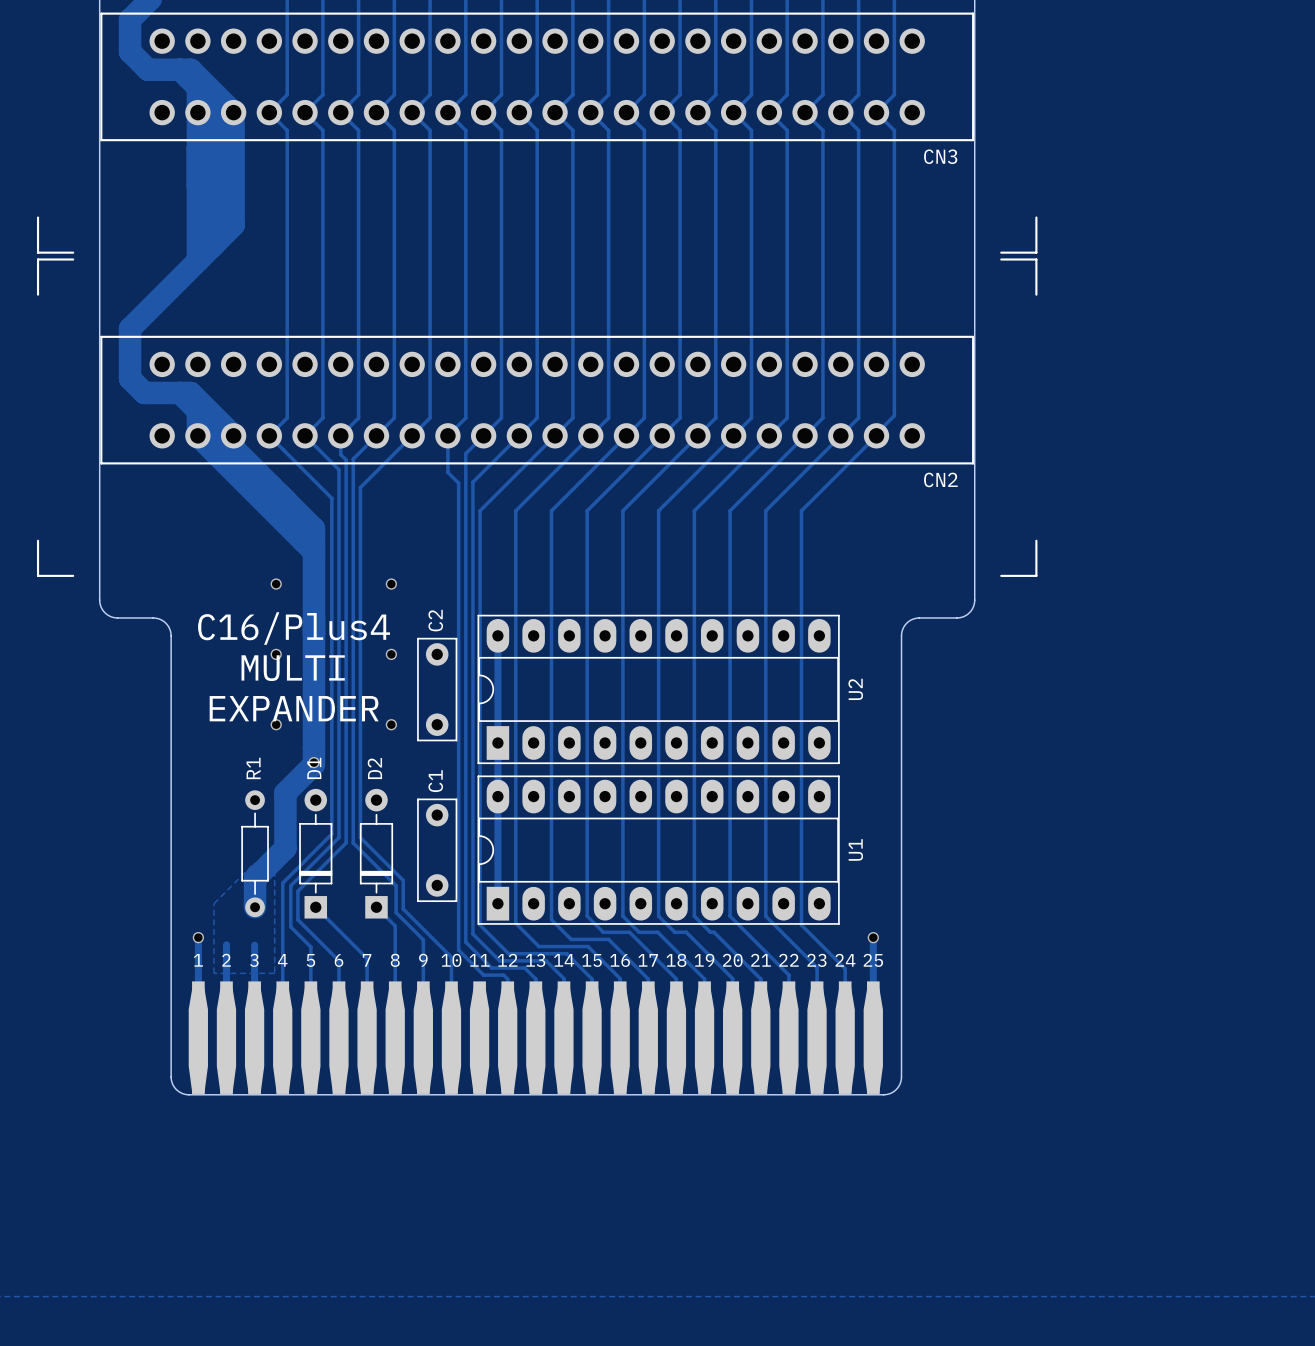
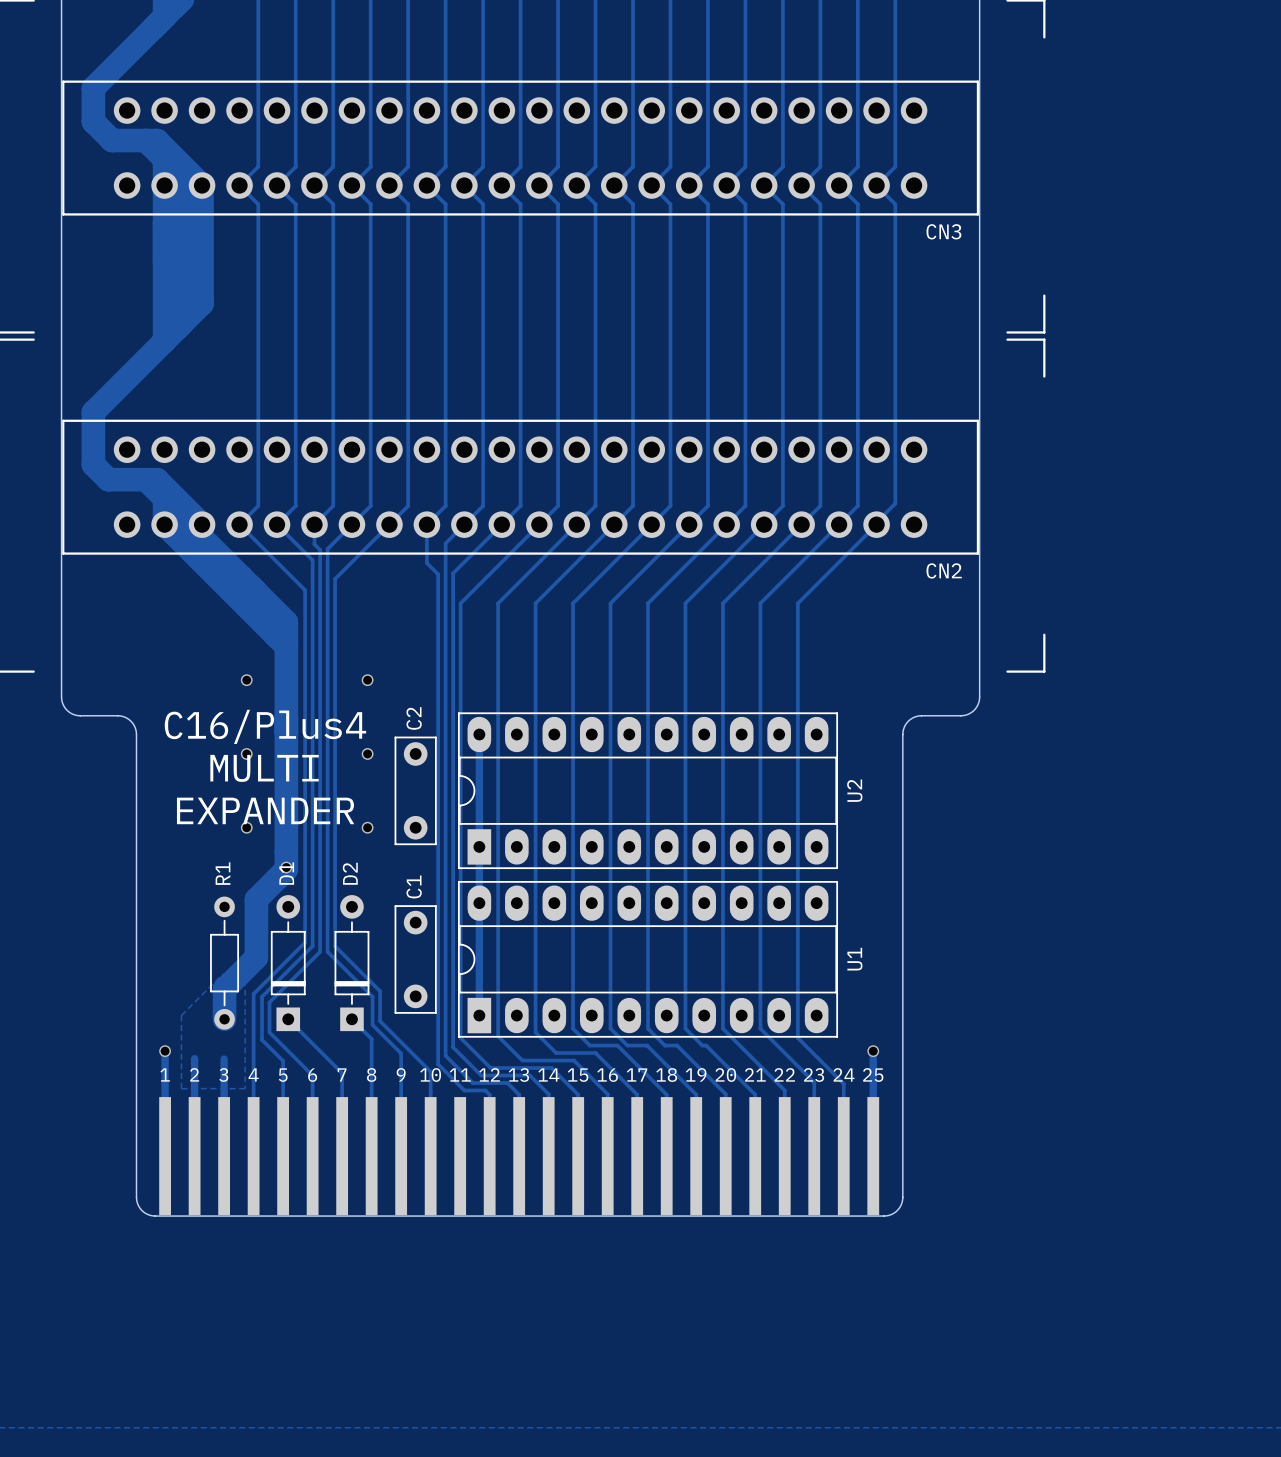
part footprint: [188, 981, 883, 1094] -> [159, 1097, 880, 1216]

